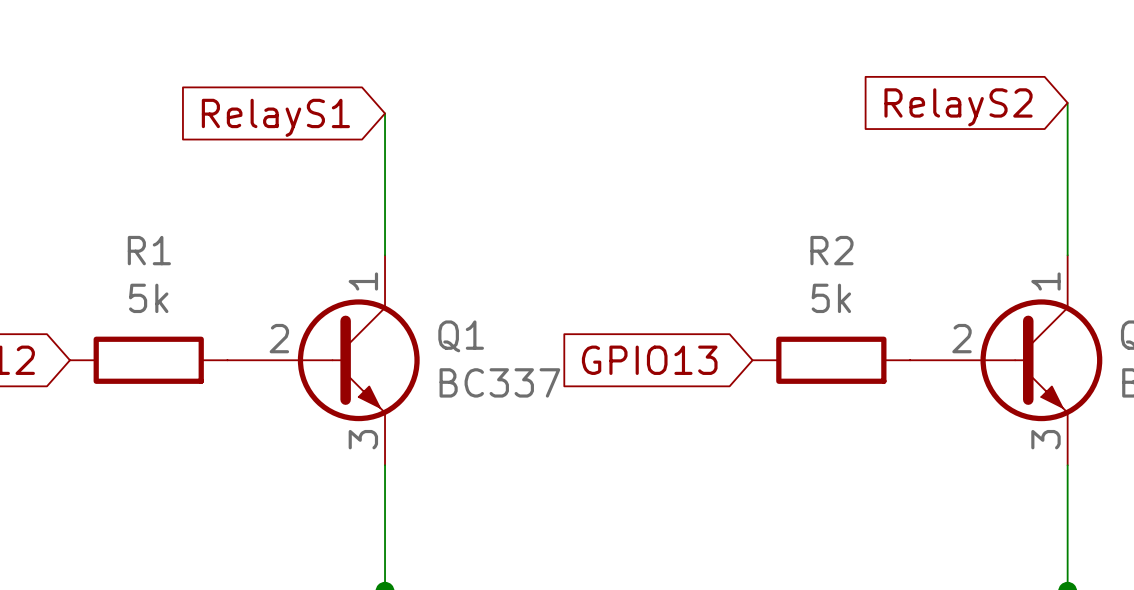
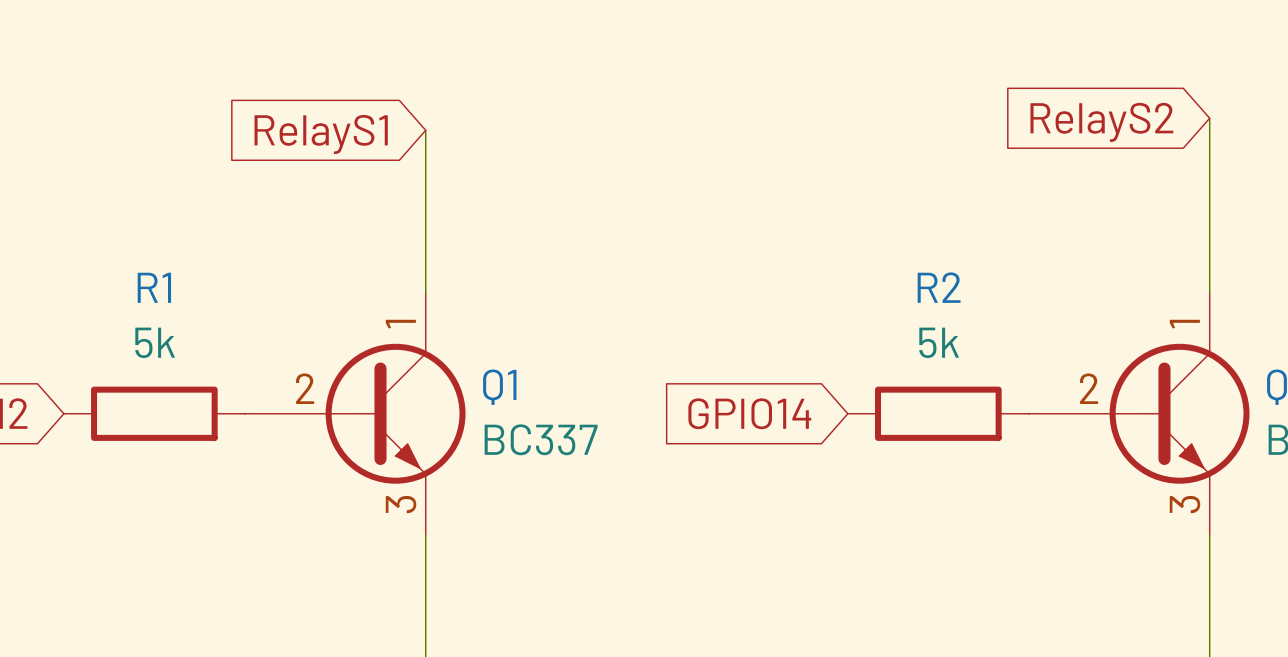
global label: GPIO13 (649, 360) -> GPIO14 (749, 413)

